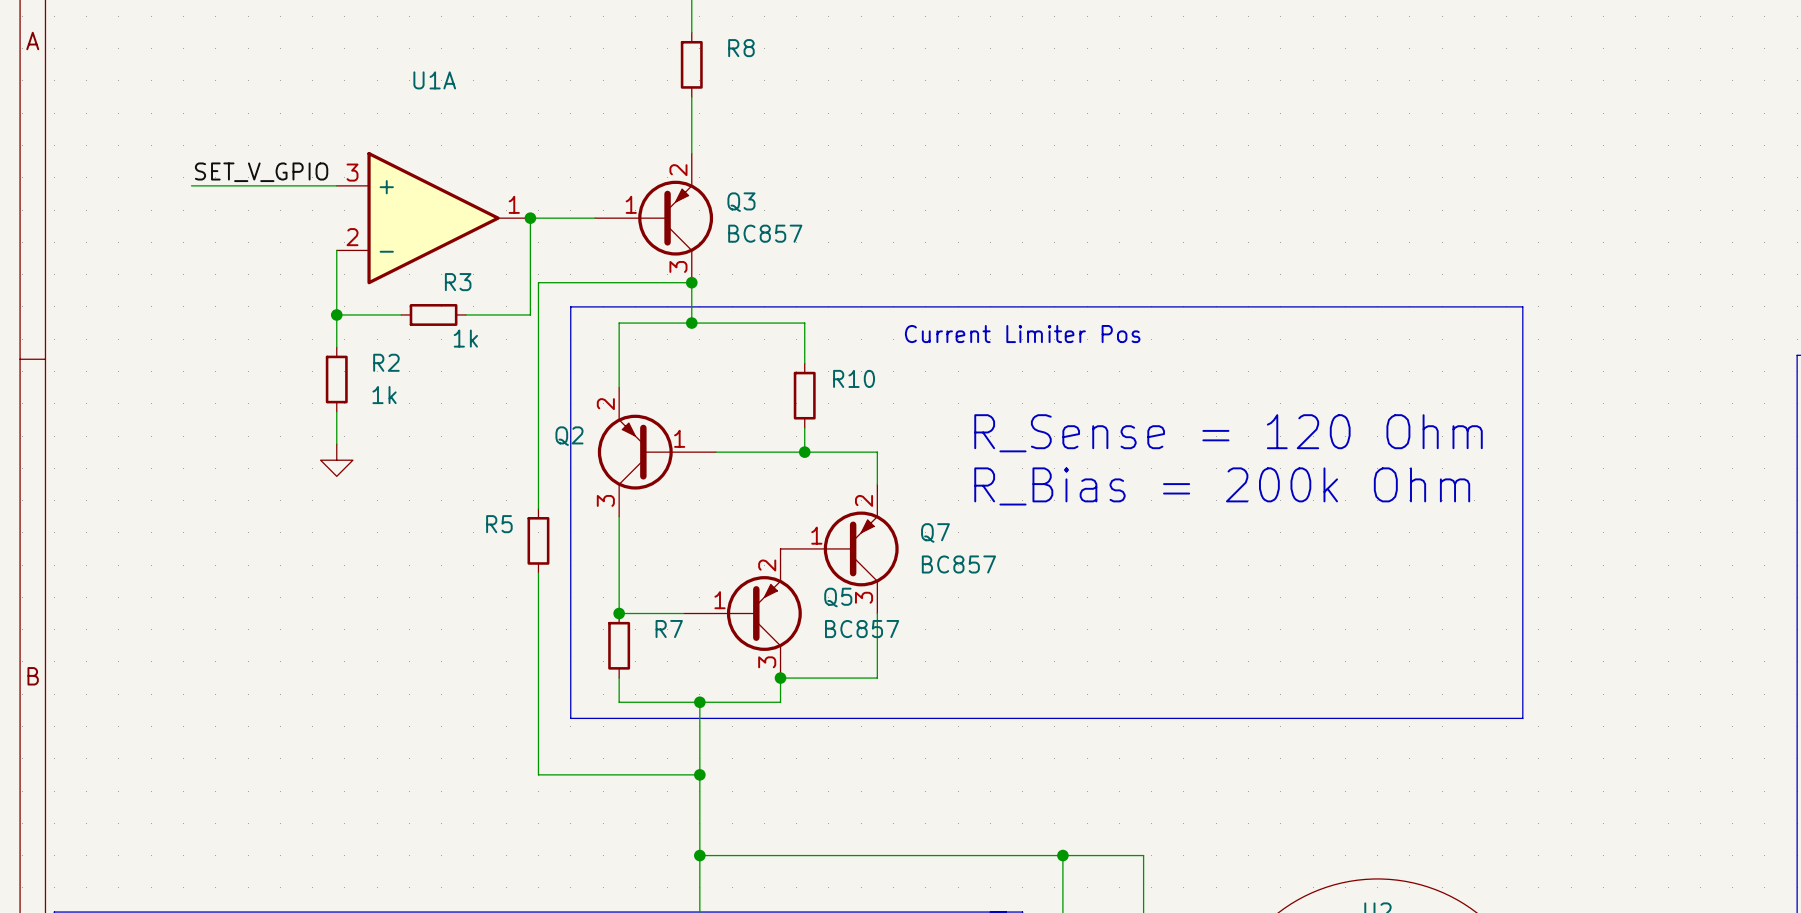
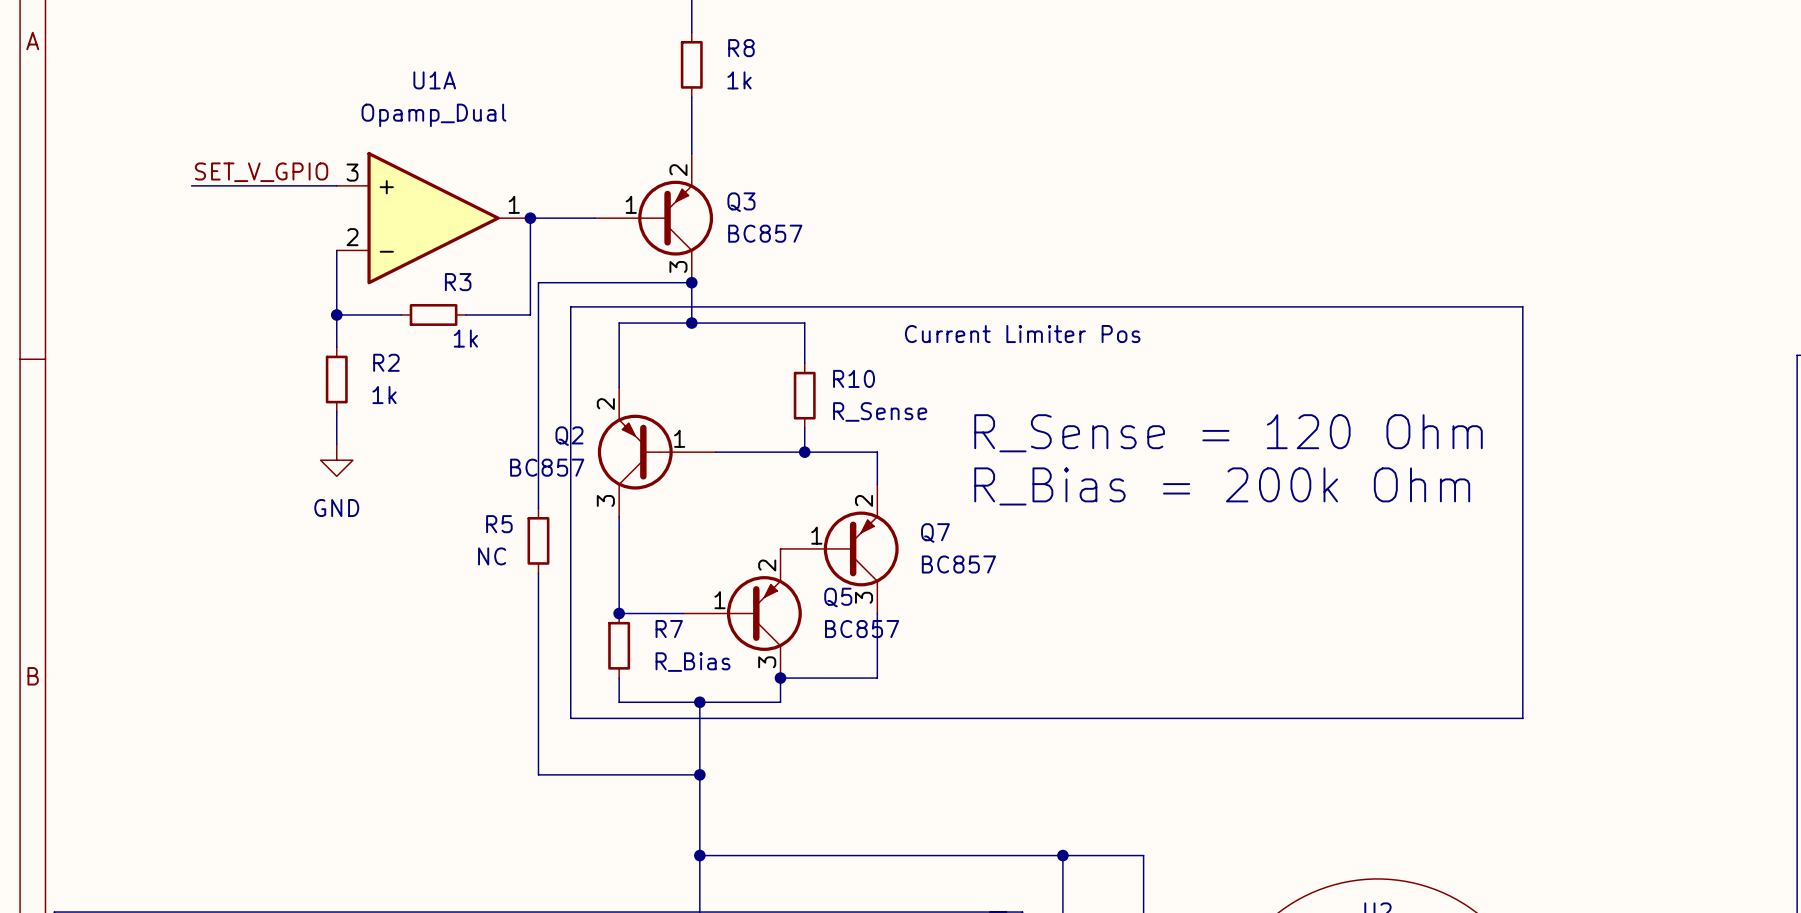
R8 value: none -> 1k (739, 80)
U1A value: none -> Opamp_Dual (433, 115)
R10 value: none -> R_Sense (880, 411)
Q2 value: none -> BC857 (547, 467)
power symbol text: none -> GND (336, 508)
R5 value: none -> NC (492, 556)
R7 value: none -> R_Bias (693, 662)

